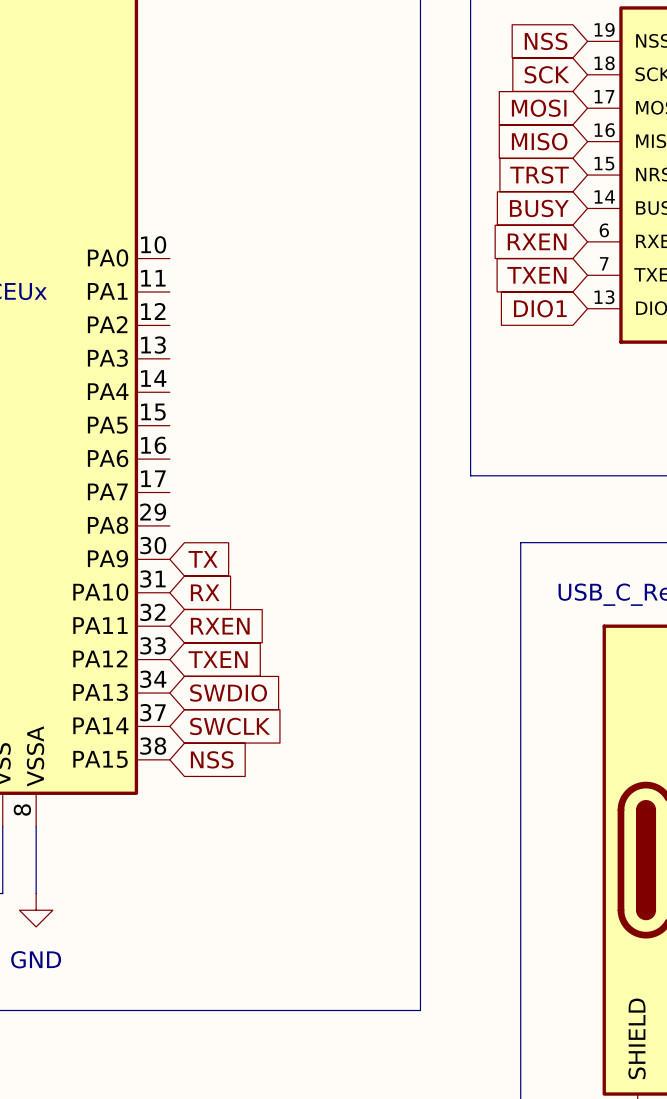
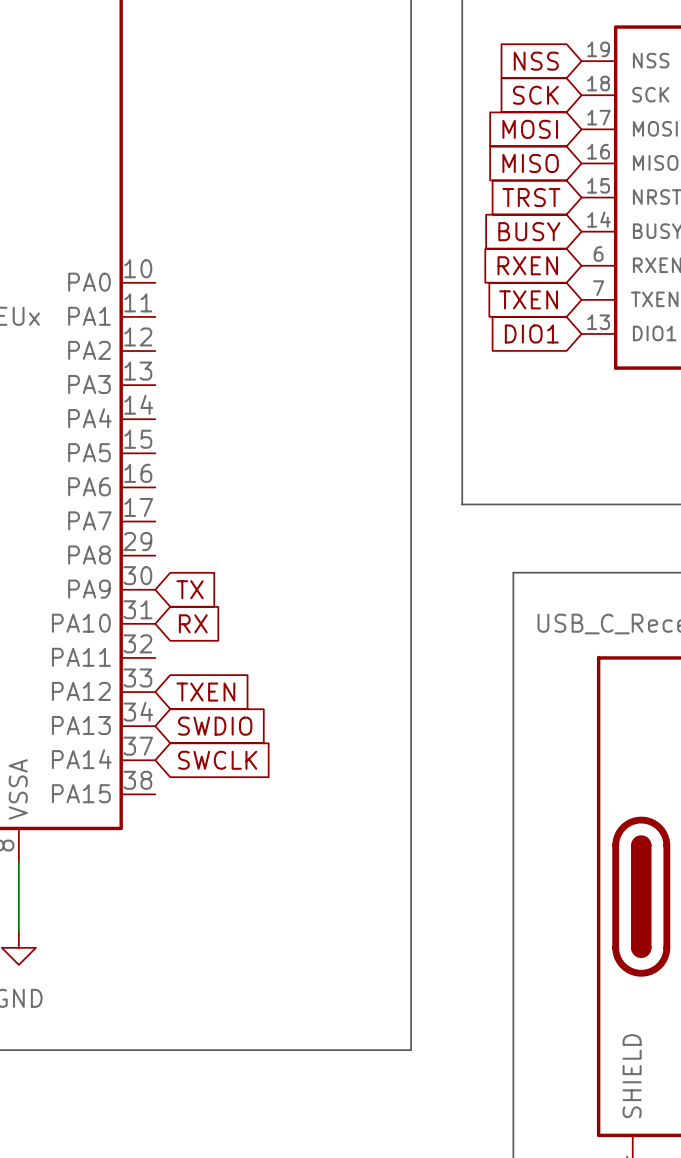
global label: RXEN (220, 626) -> none
global label: NSS (212, 759) -> none

